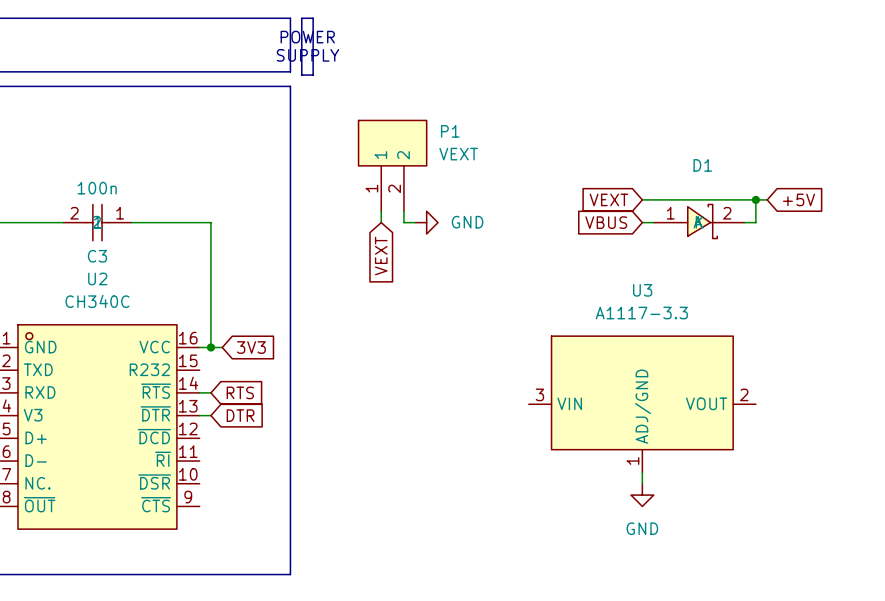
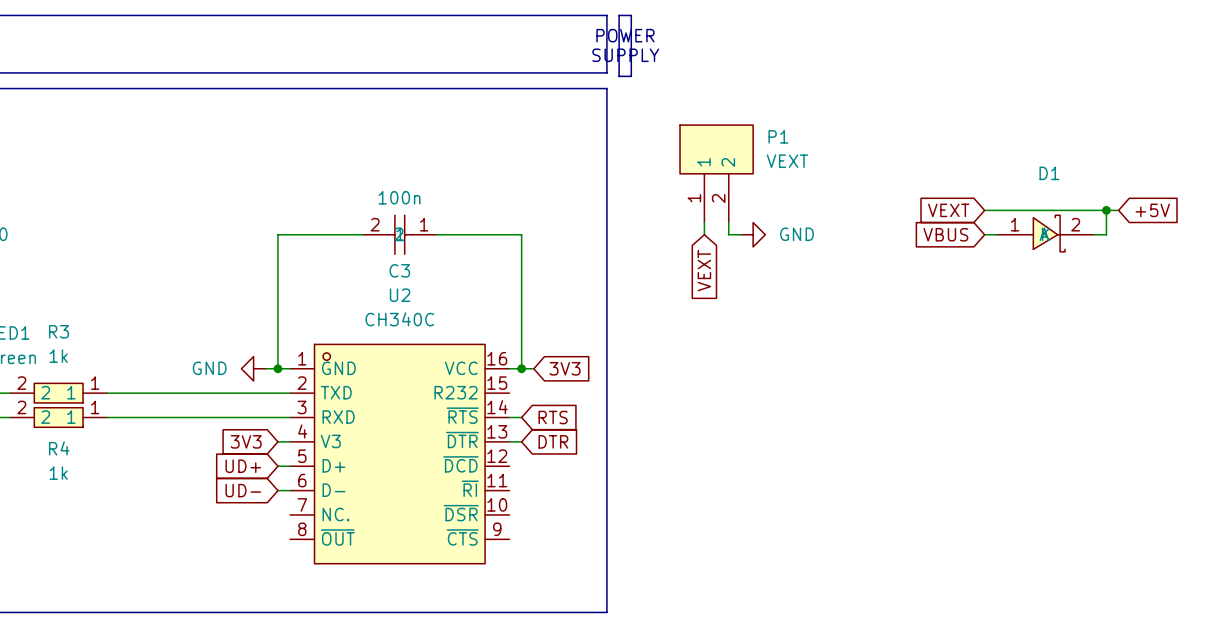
U3: A1117-3.3 (642, 404) -> none
wire: (642, 472) (642, 483) -> none
power symbol: GND (642, 495) -> none

